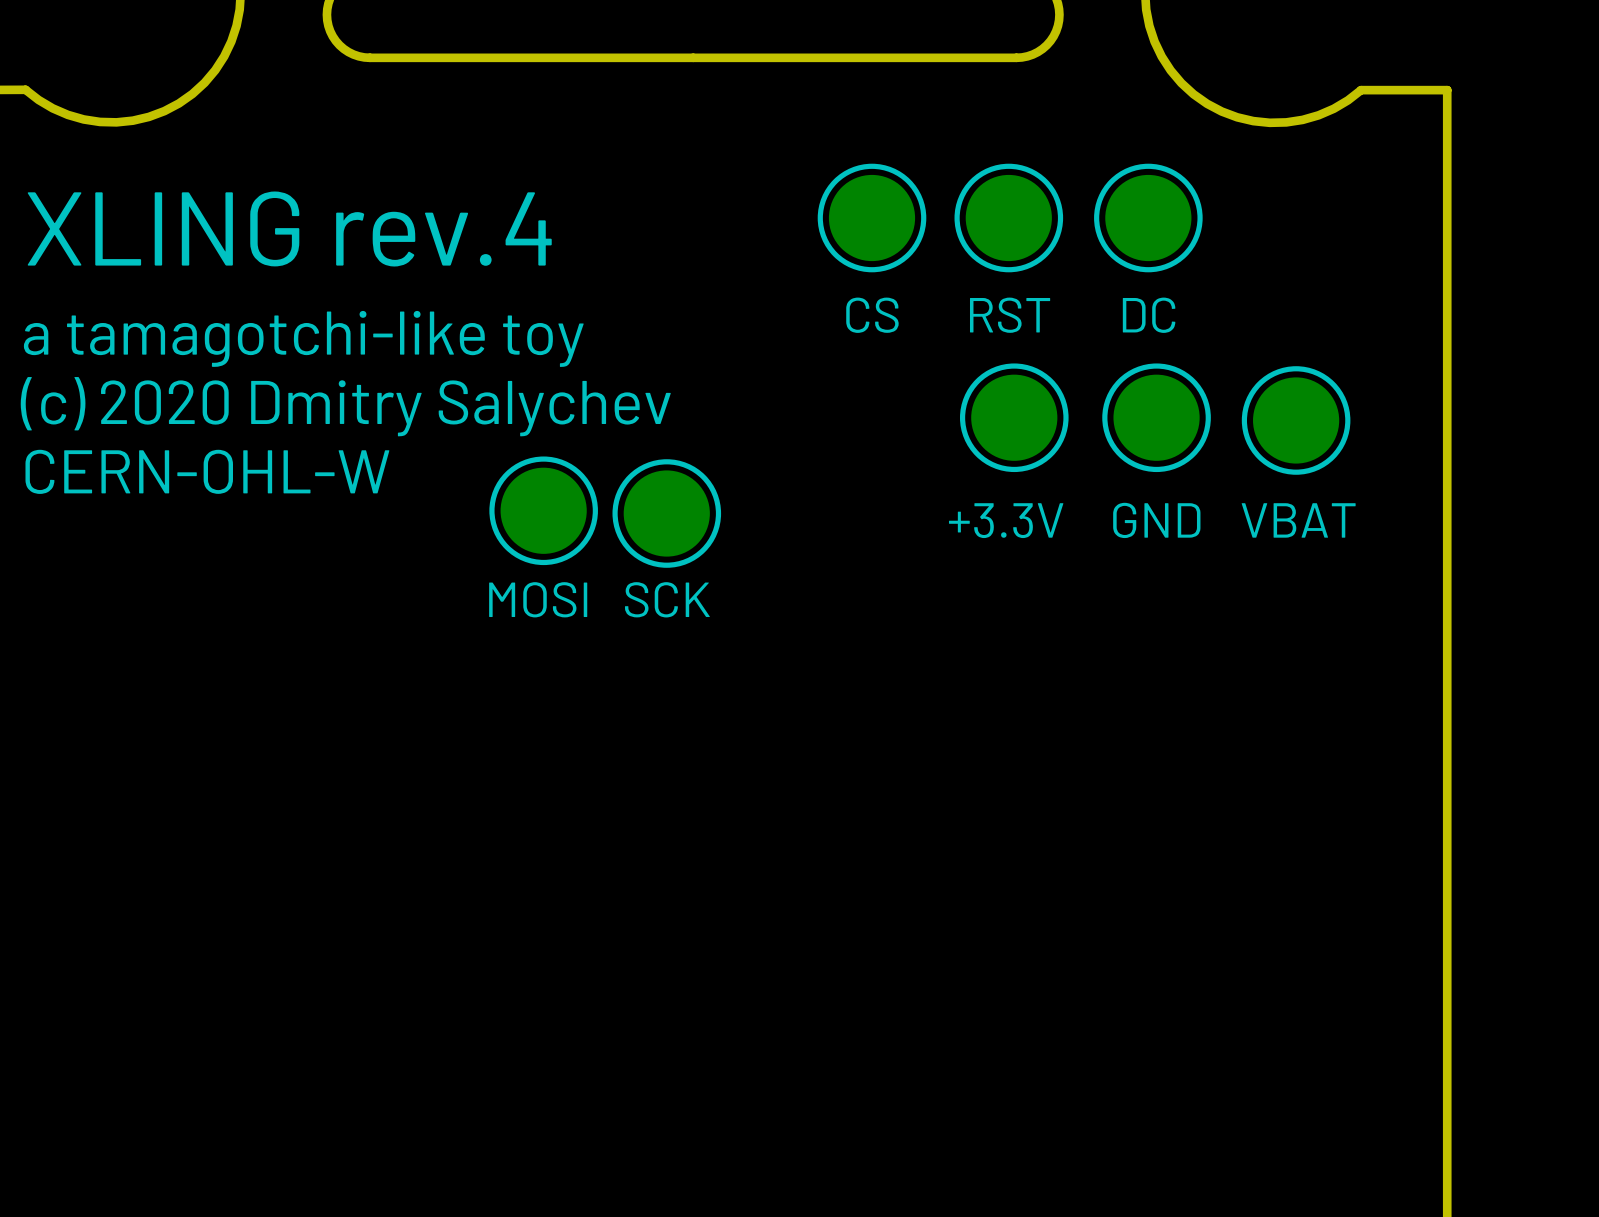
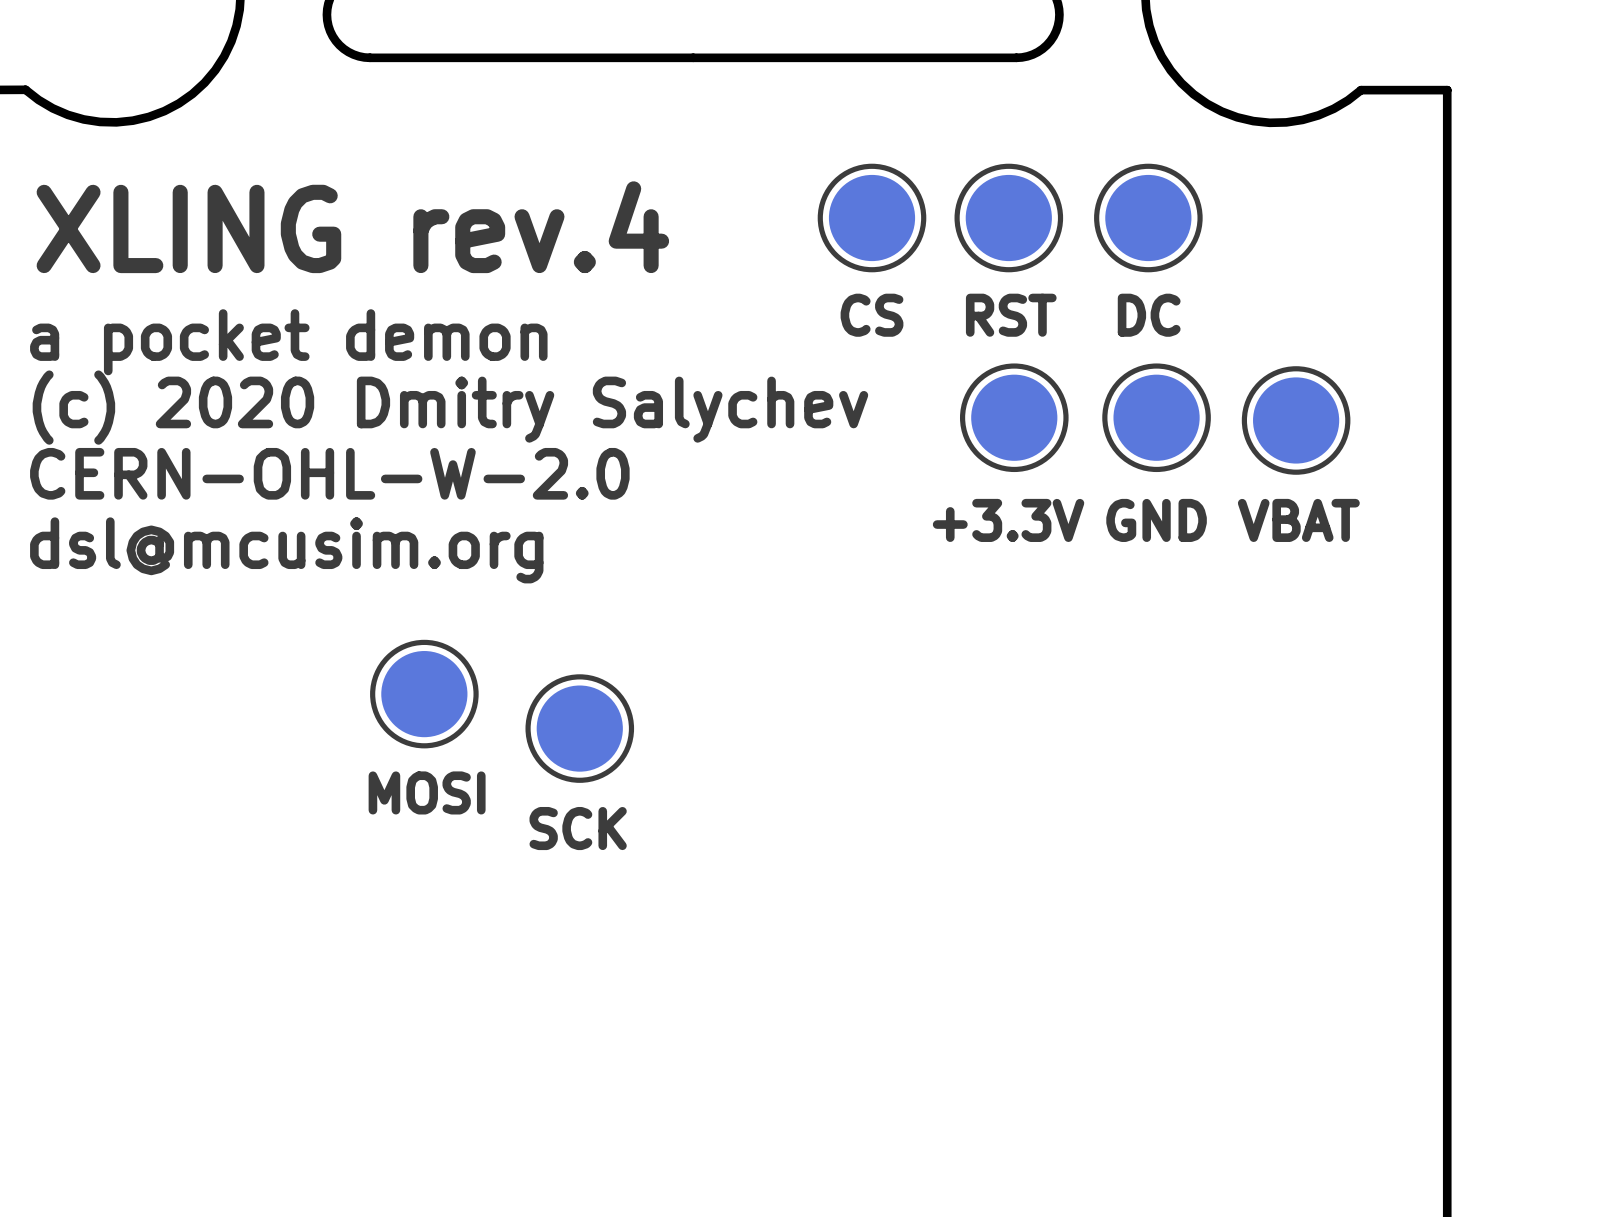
text: a tamagotchi-like toy (303, 338) -> a pocket demon (288, 342)
text: CERN-OHL-W (207, 471) -> CERN-OHL-W-2.0 (329, 473)
part: (543, 510) -> none
part: (666, 513) -> none
text: none -> dsl@mcusim.org (286, 550)
text position: MOSI (538, 599) -> MOSI (427, 792)
text position: SCK (667, 599) -> SCK (578, 828)
part: none -> (424, 694)
part: none -> (579, 728)

